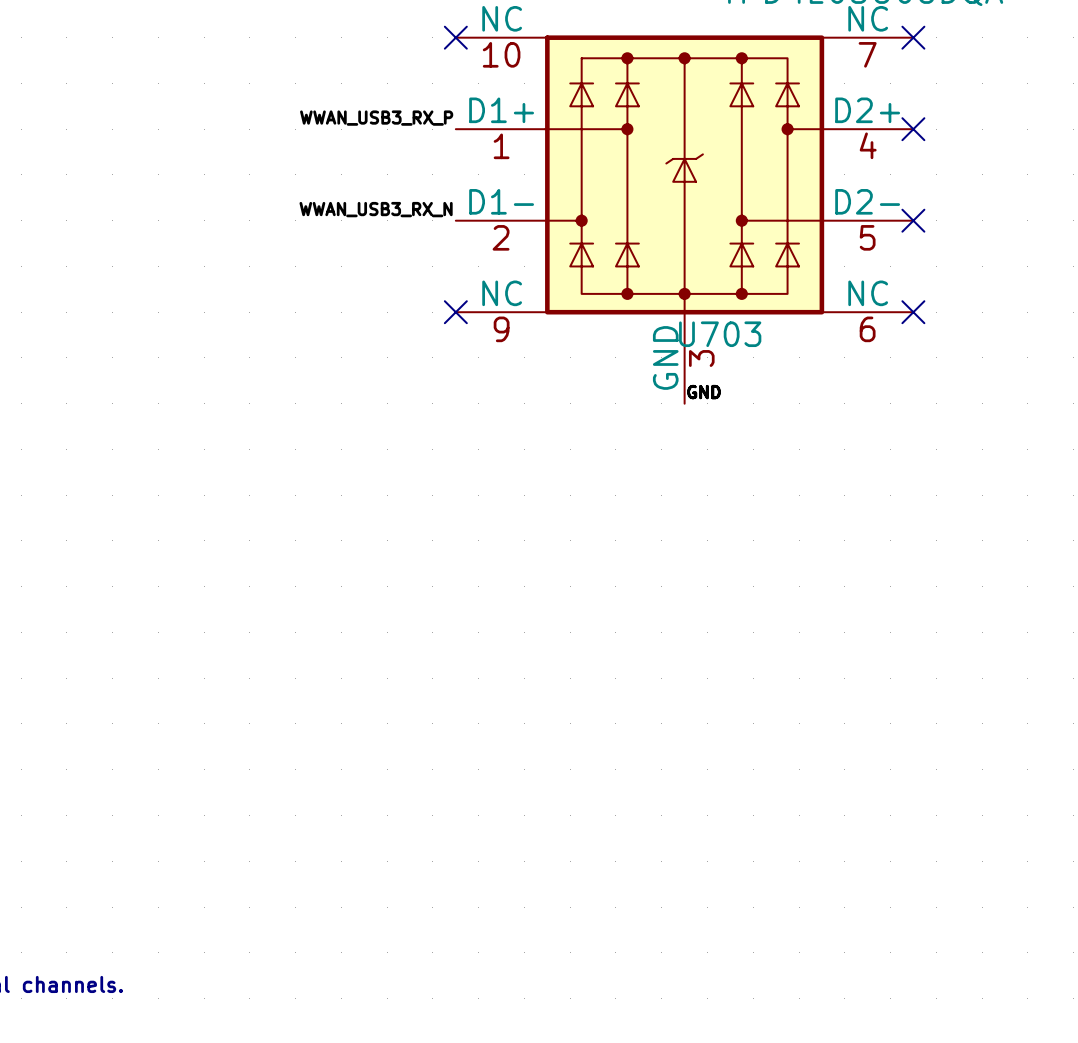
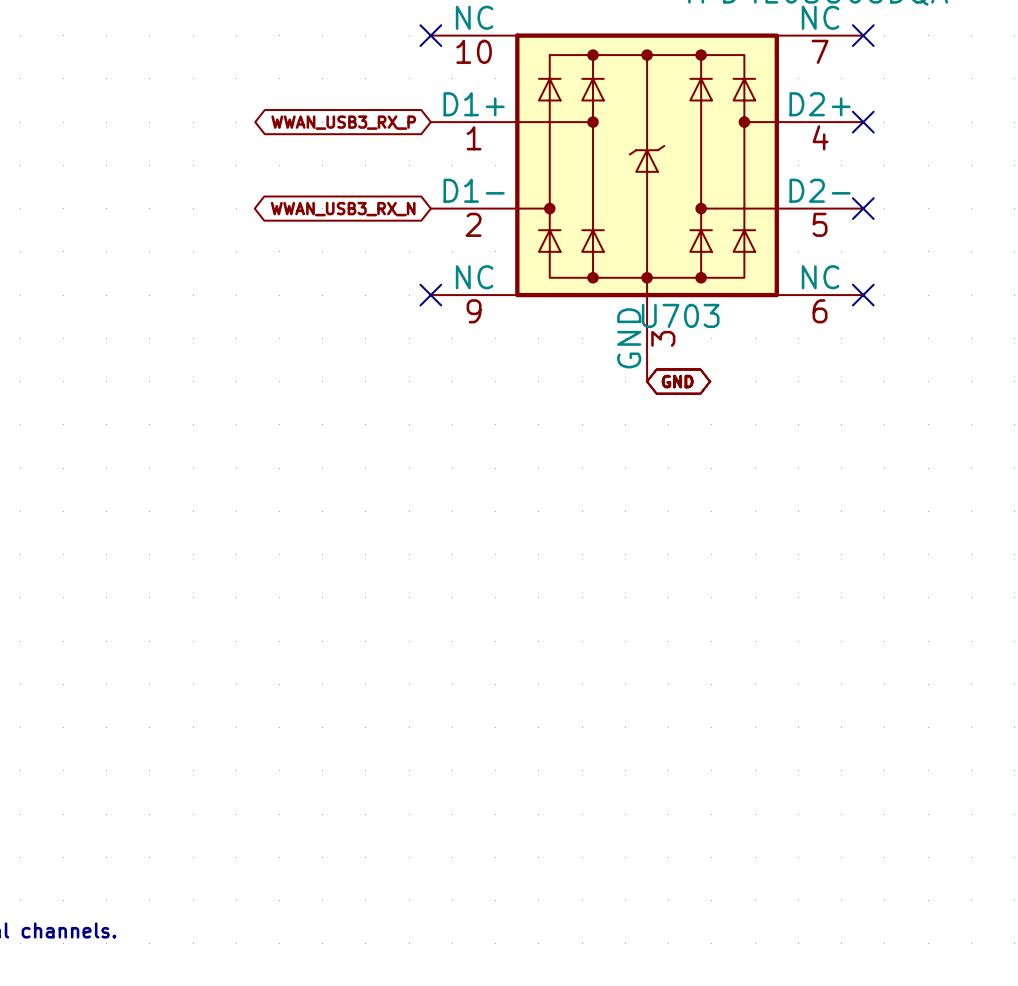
label: WWAN_USB3_RX_P (376, 118) -> none
global label: none -> WWAN_USB3_RX_P (343, 122)
label: WWAN_USB3_RX_N (376, 209) -> none
global label: none -> WWAN_USB3_RX_N (343, 209)
label: GND (703, 392) -> none
global label: none -> GND (677, 381)

